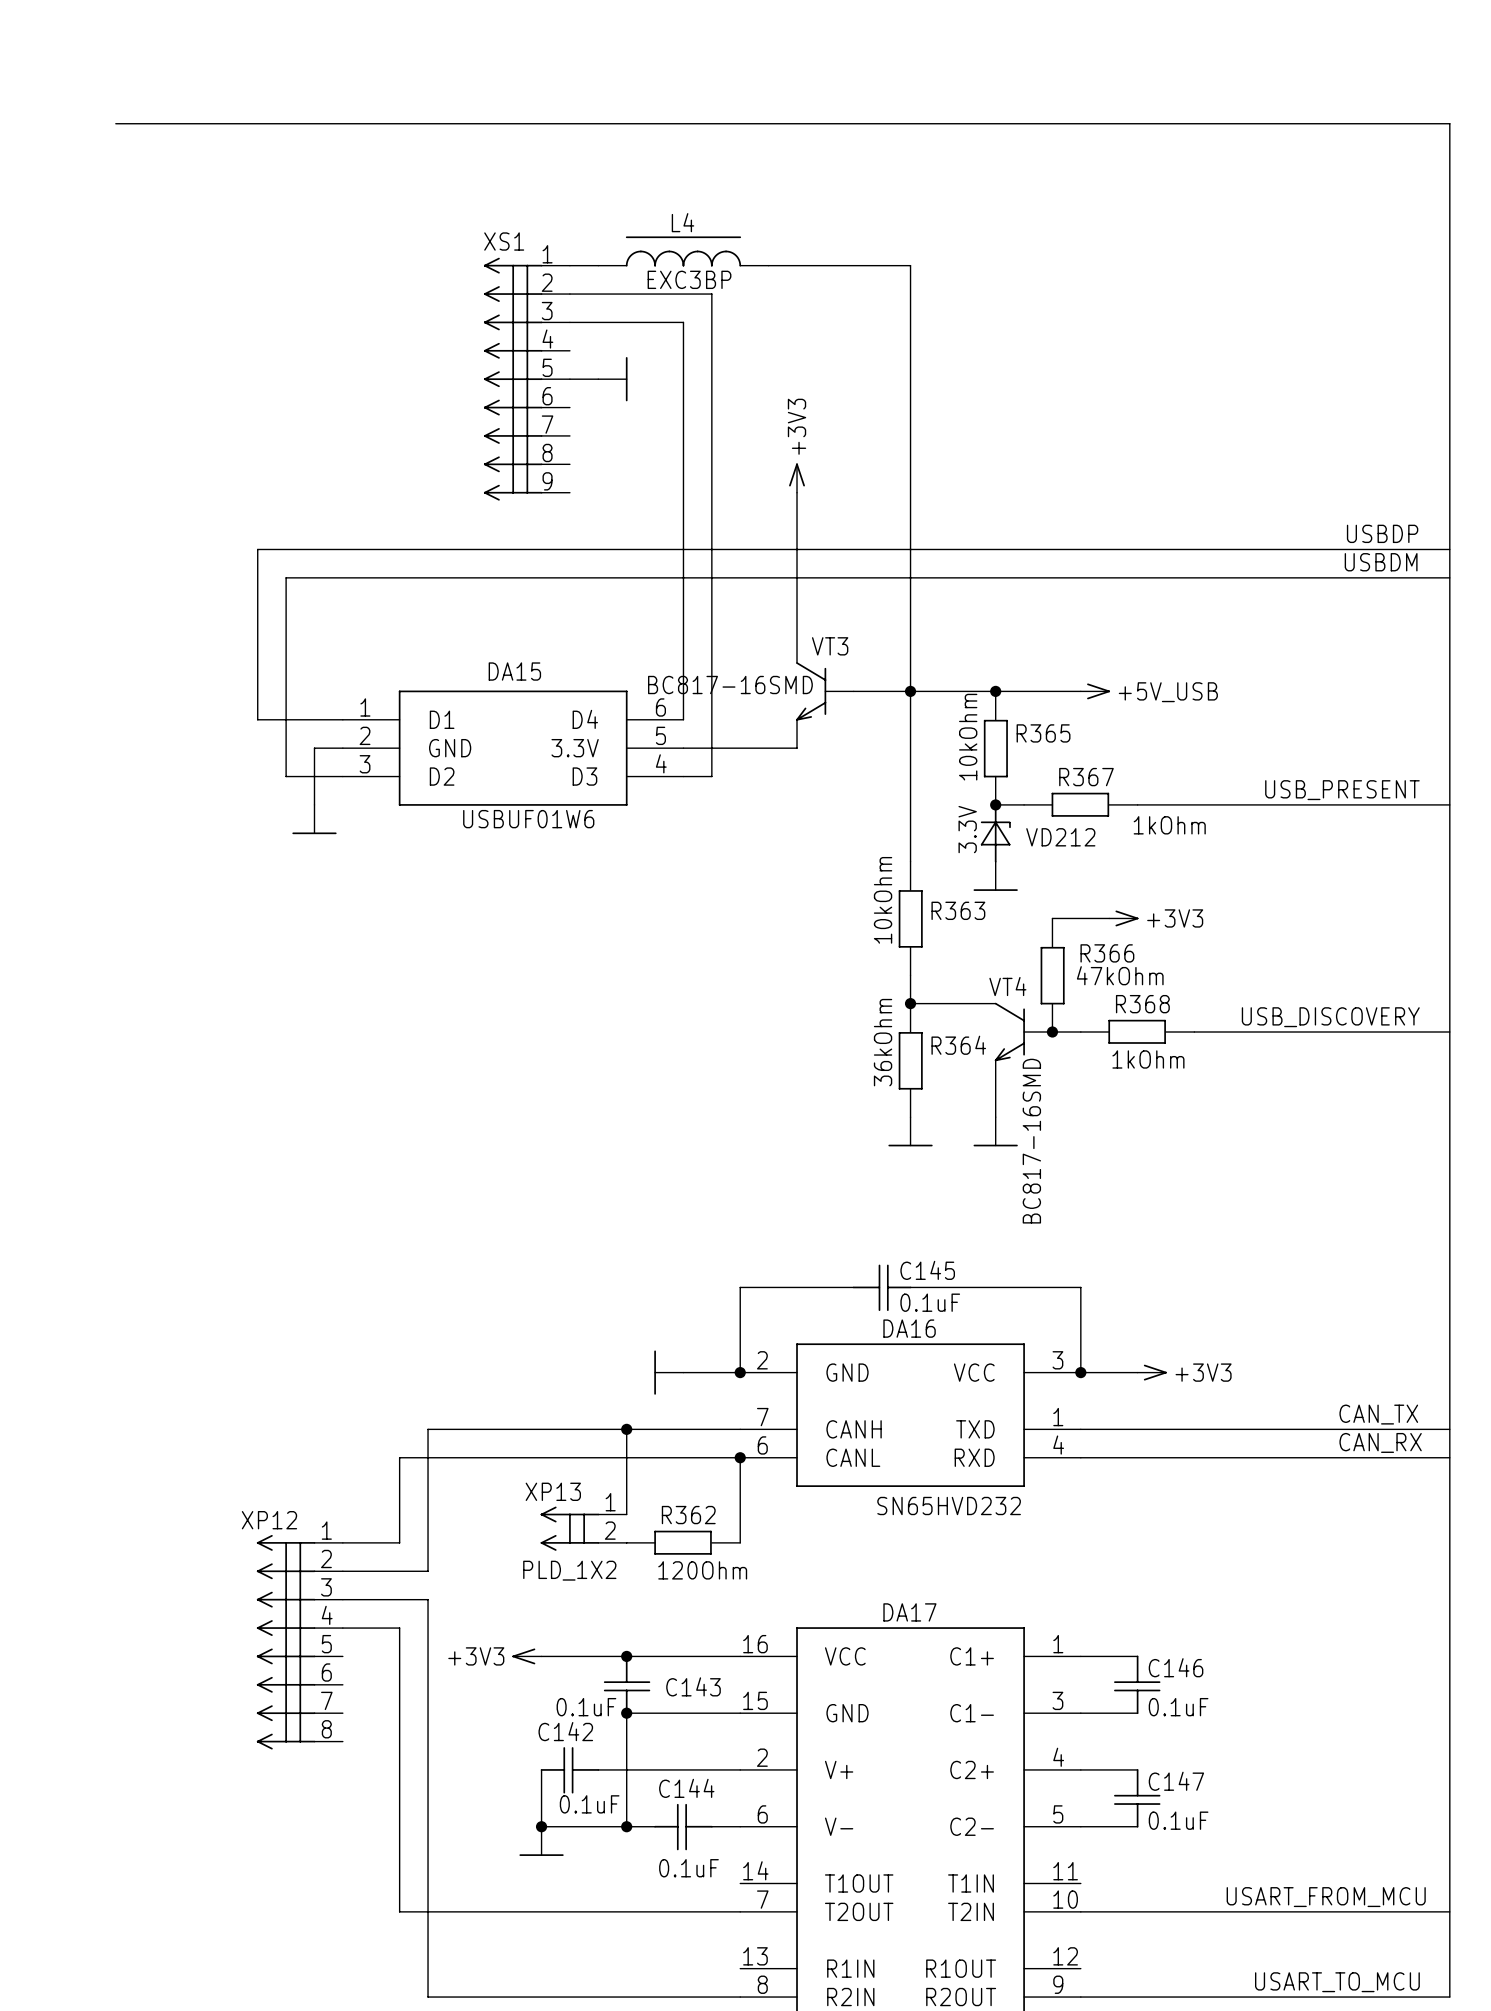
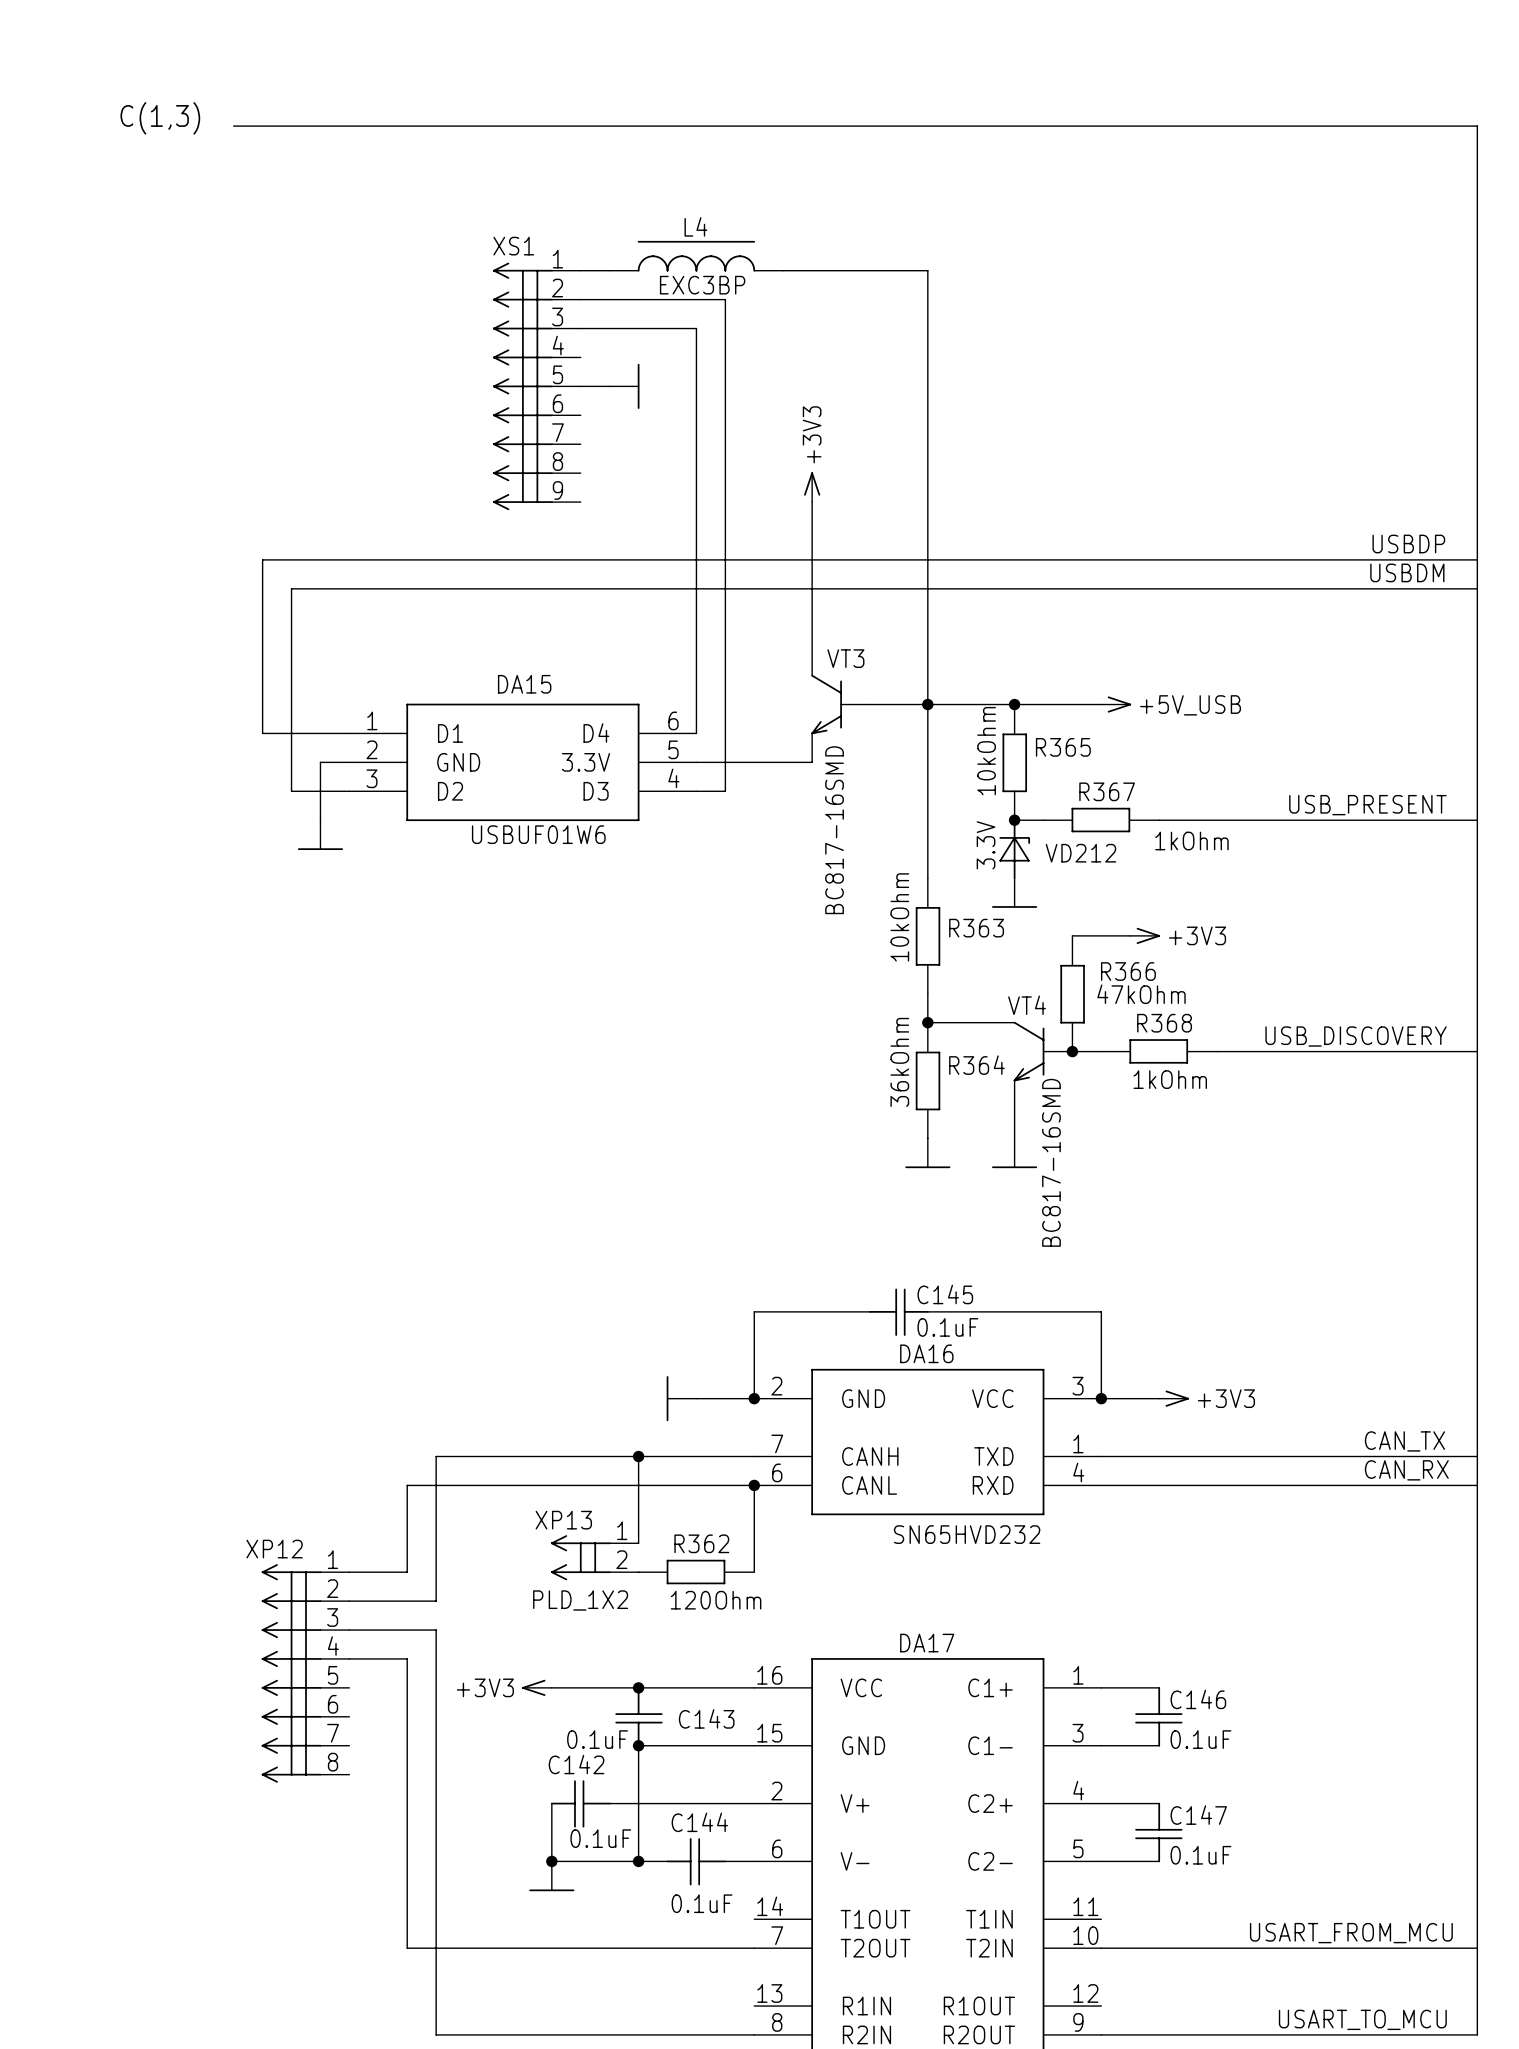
text: none -> C(1,3) (160, 118)
bus: (115, 123) (229, 123) -> none
VT3 value rotation: 0° (730, 685) -> 90° counterclockwise (834, 830)

